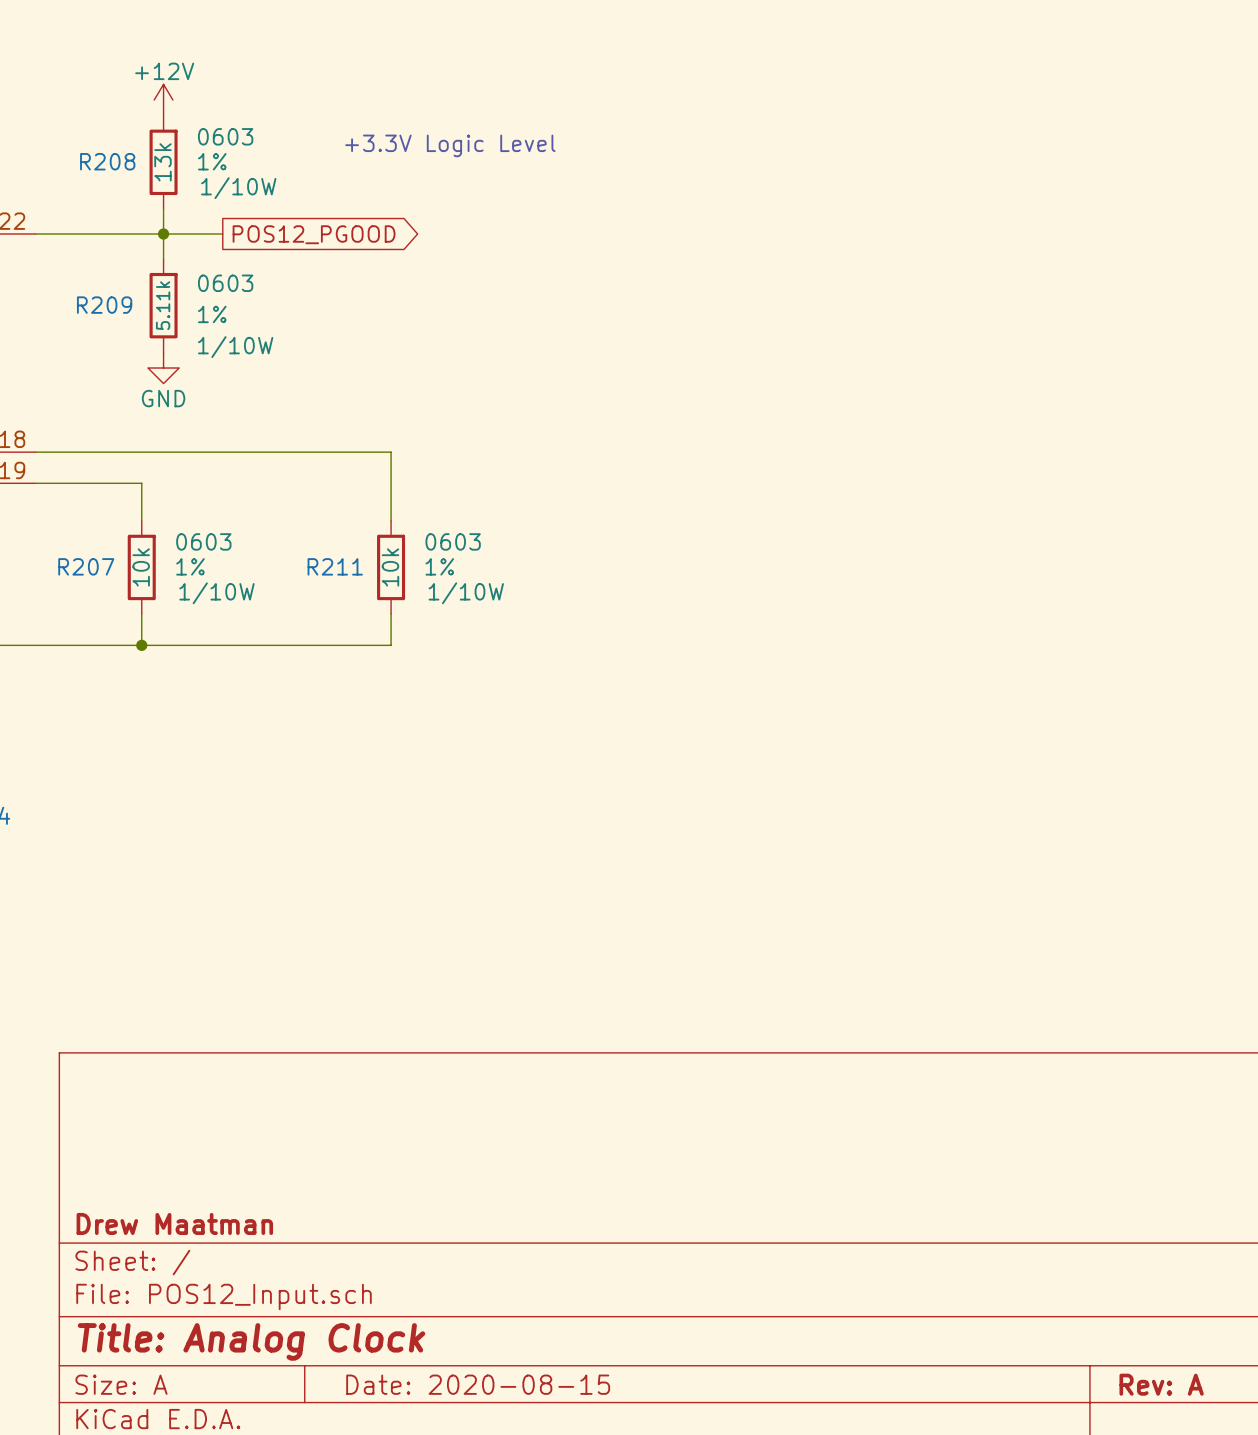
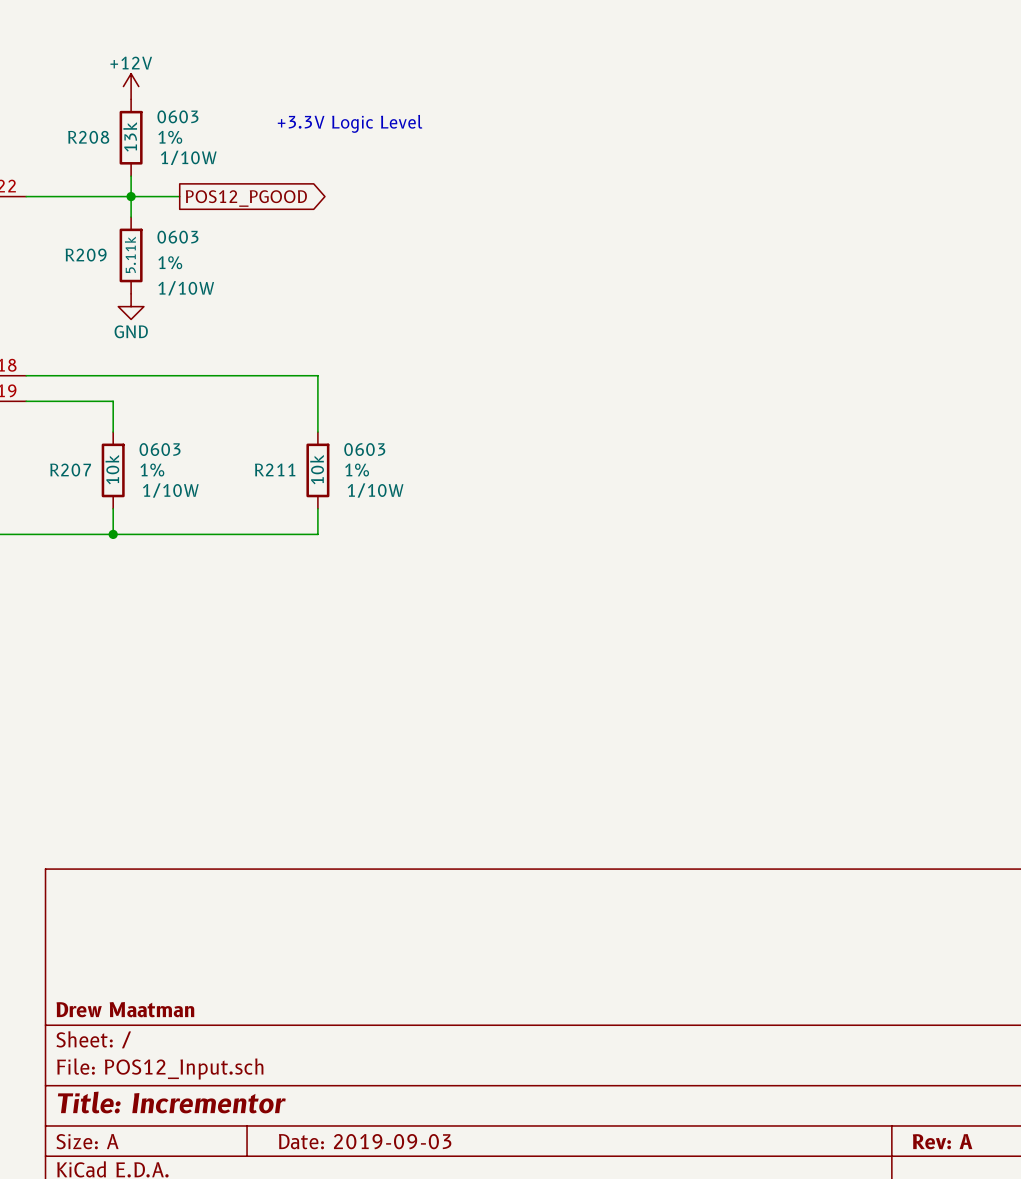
title block: Title: Analog Clock (251, 1341) -> Title: Incrementor (171, 1102)
title block: Date: 2020-08-15 (478, 1384) -> Date: 2019-09-03 (365, 1141)

